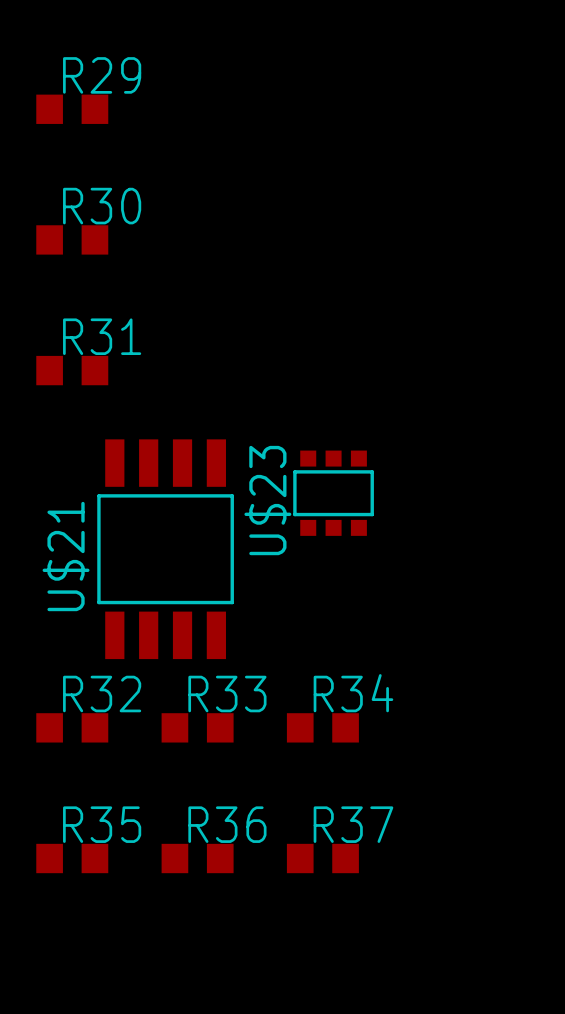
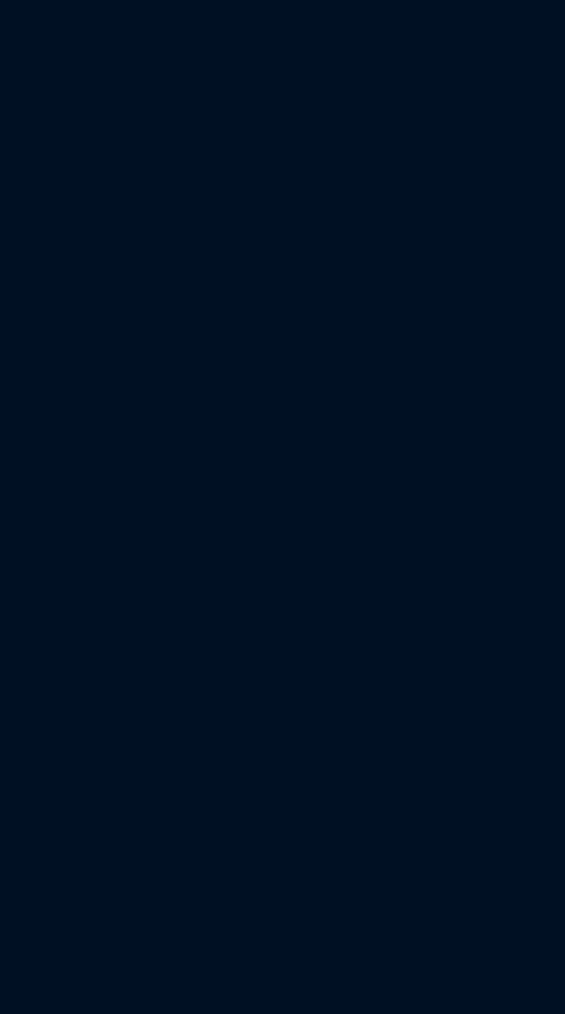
R29: (72, 109) -> none
R30: (72, 239) -> none
R31: (72, 370) -> none
U$23: (333, 493) -> none
U$21: (165, 549) -> none
R32: (72, 727) -> none
R33: (197, 727) -> none
R34: (322, 727) -> none
R35: (72, 858) -> none
R36: (197, 858) -> none
R37: (322, 858) -> none

